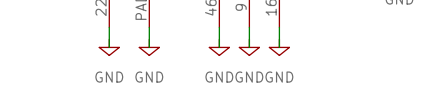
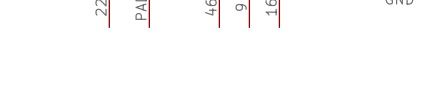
wire: (109, 27) (109, 47) -> none
wire: (149, 27) (149, 47) -> none
wire: (219, 27) (219, 47) -> none
wire: (249, 27) (249, 47) -> none
wire: (279, 27) (279, 47) -> none
power symbol: GND (109, 47) -> none
power symbol: GND (149, 47) -> none
power symbol: GND (219, 47) -> none
power symbol: GND (249, 47) -> none
power symbol: GND (279, 47) -> none

